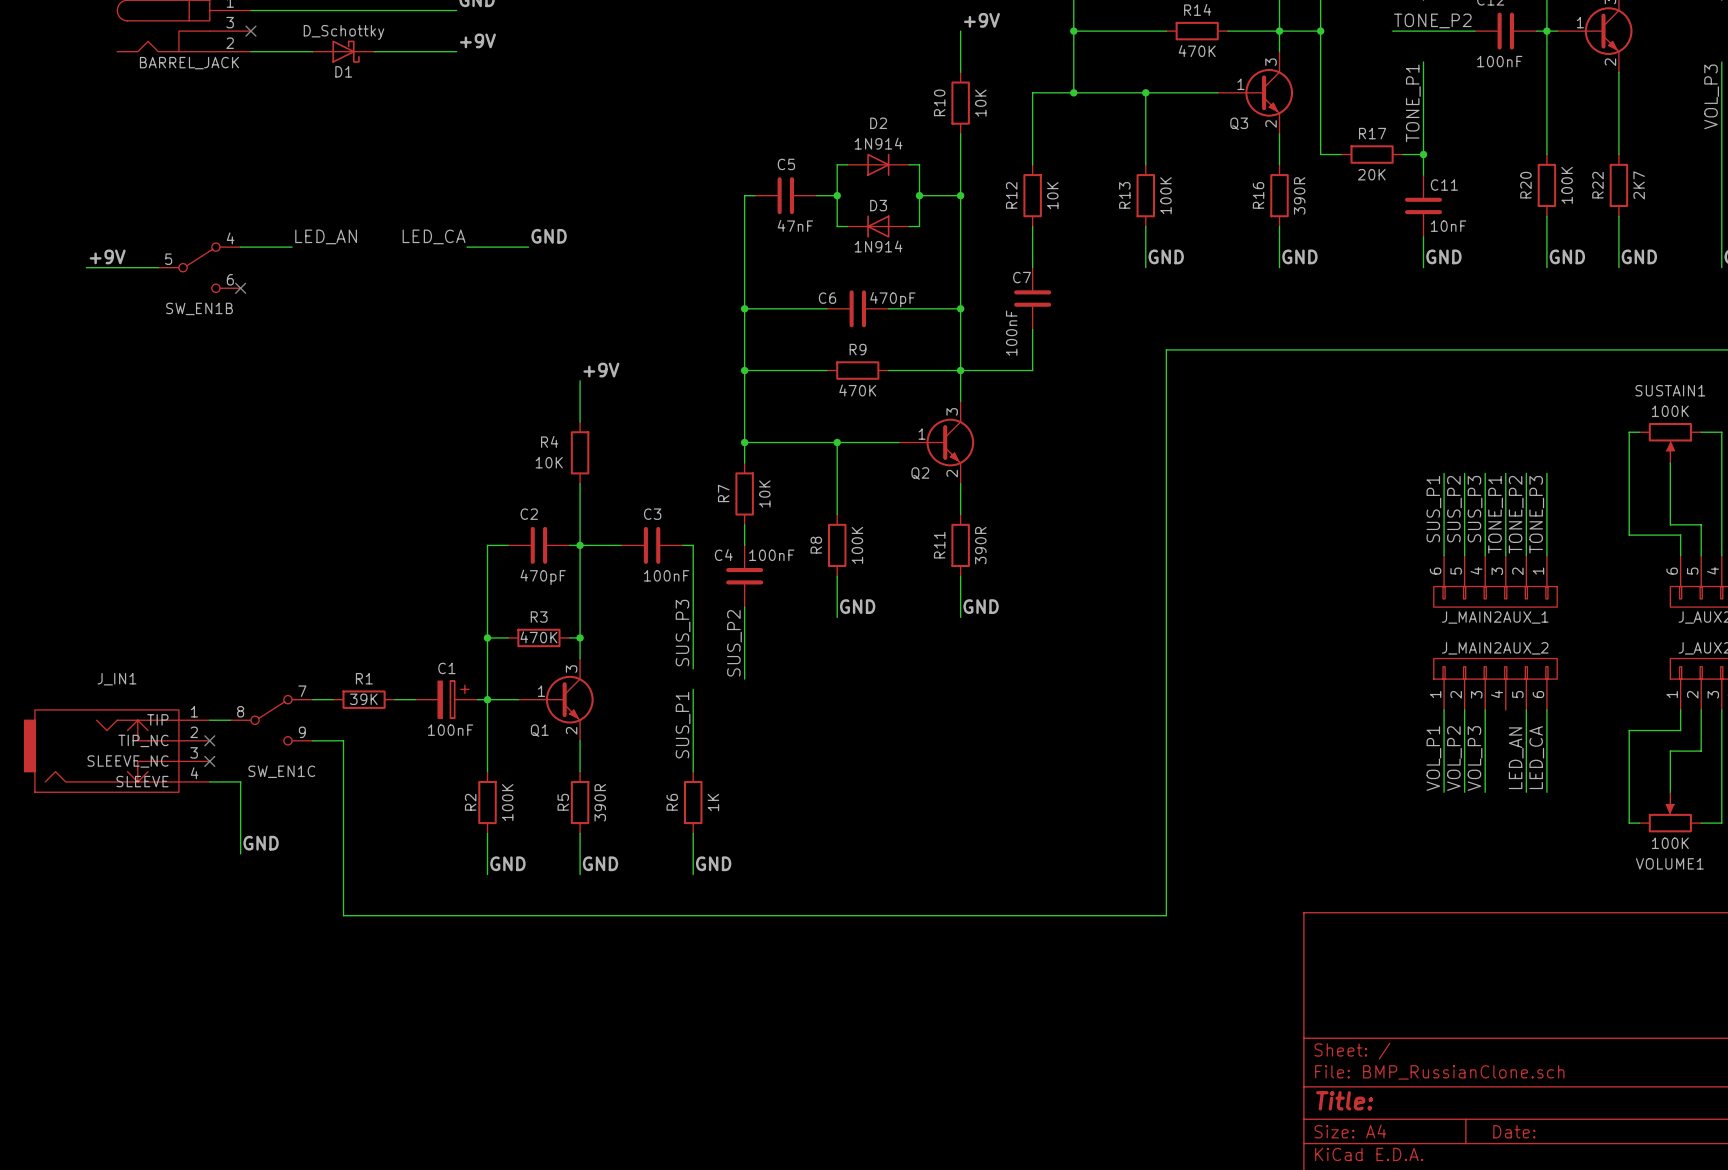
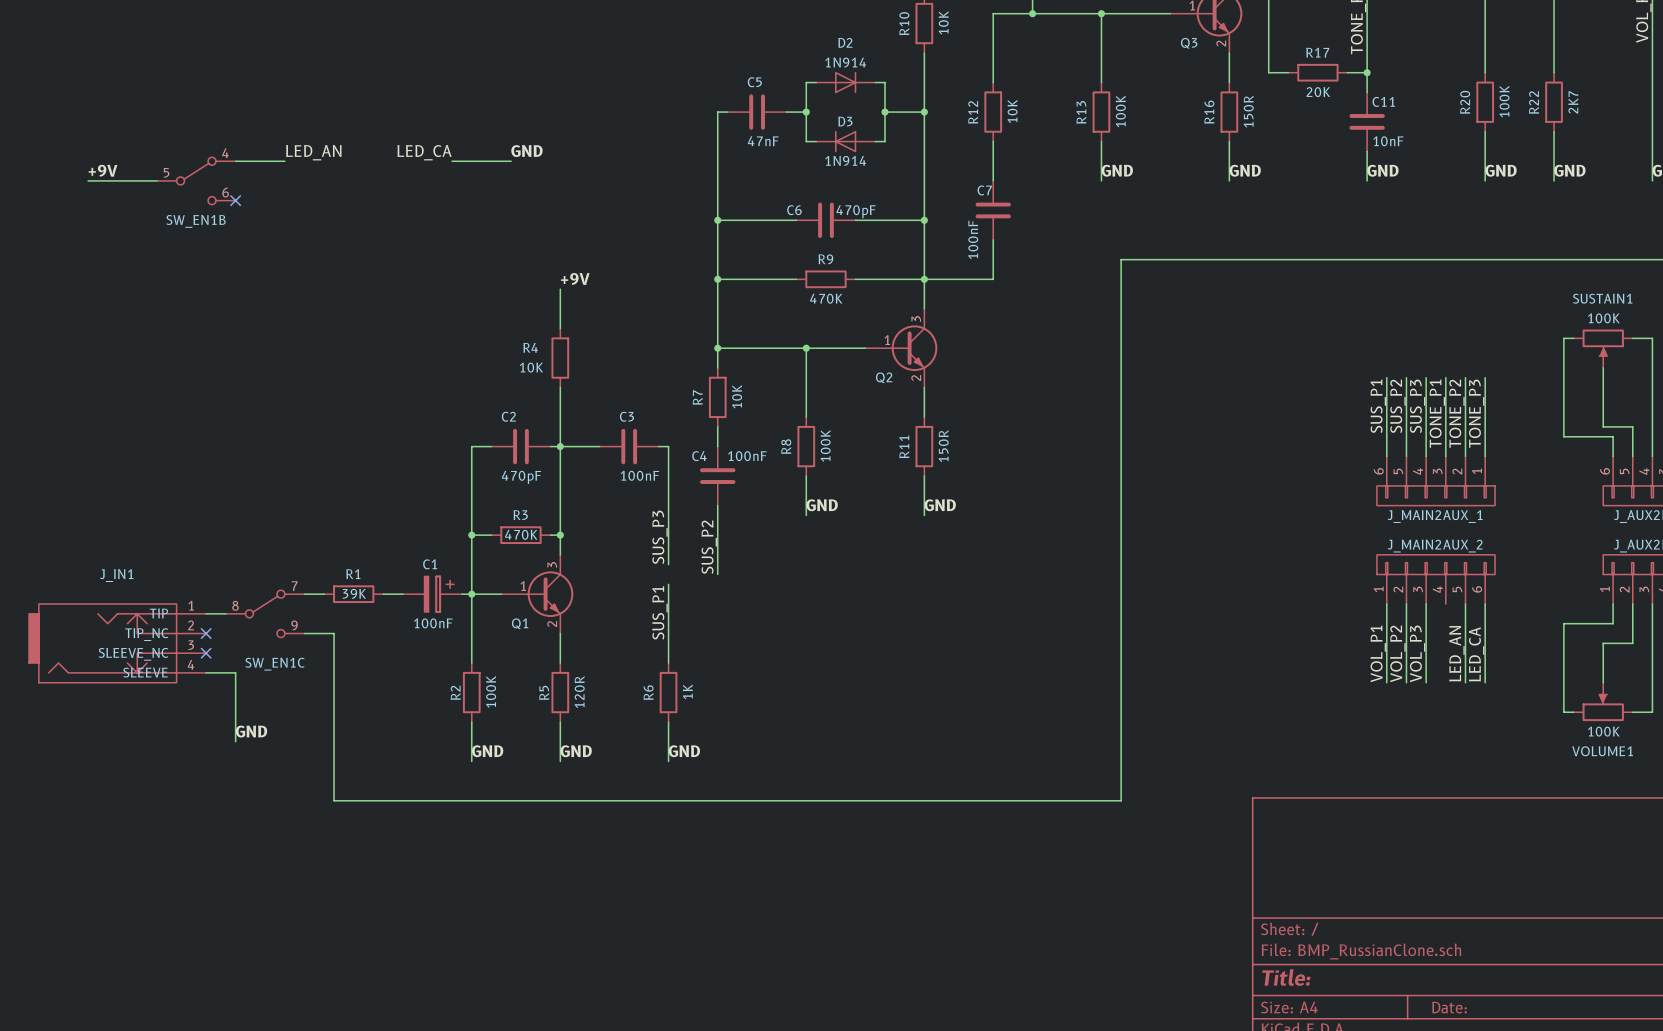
R16 value: 390R (1299, 195) -> 150R (1248, 111)
R11 value: 390R (980, 545) -> 150R (943, 446)
R5 value: 390R (600, 802) -> 120R (579, 692)

